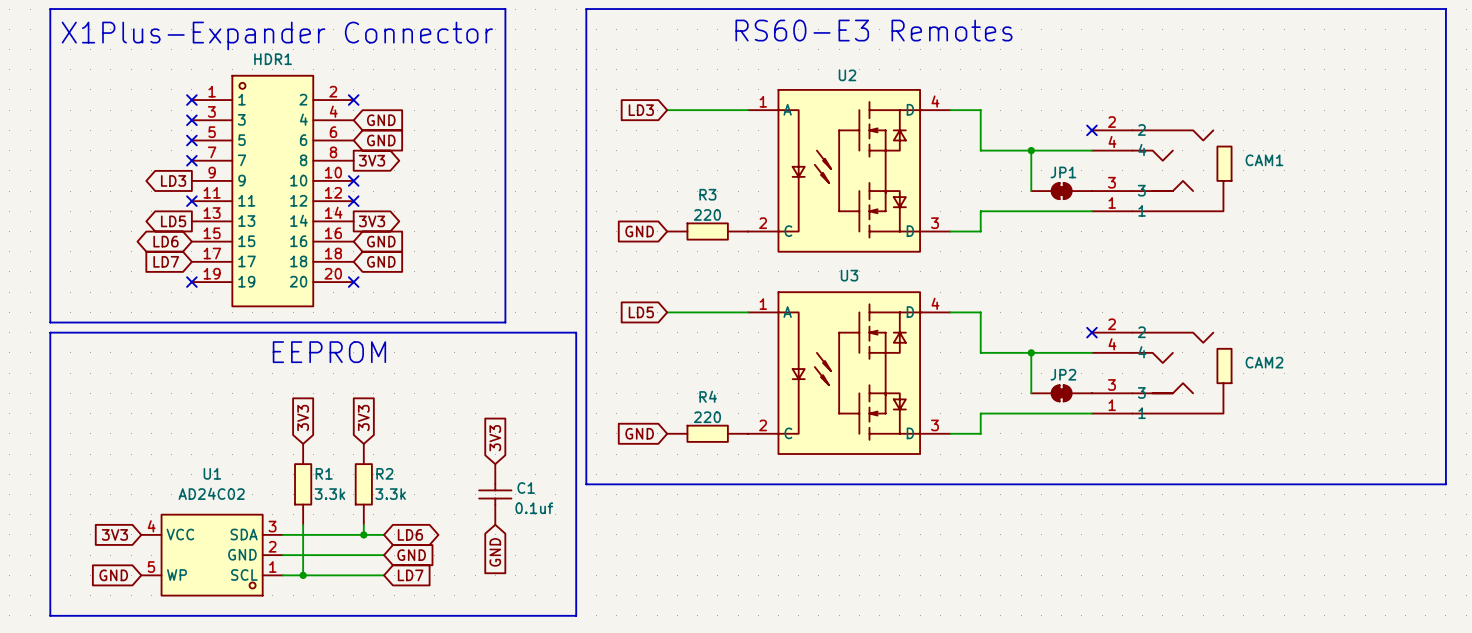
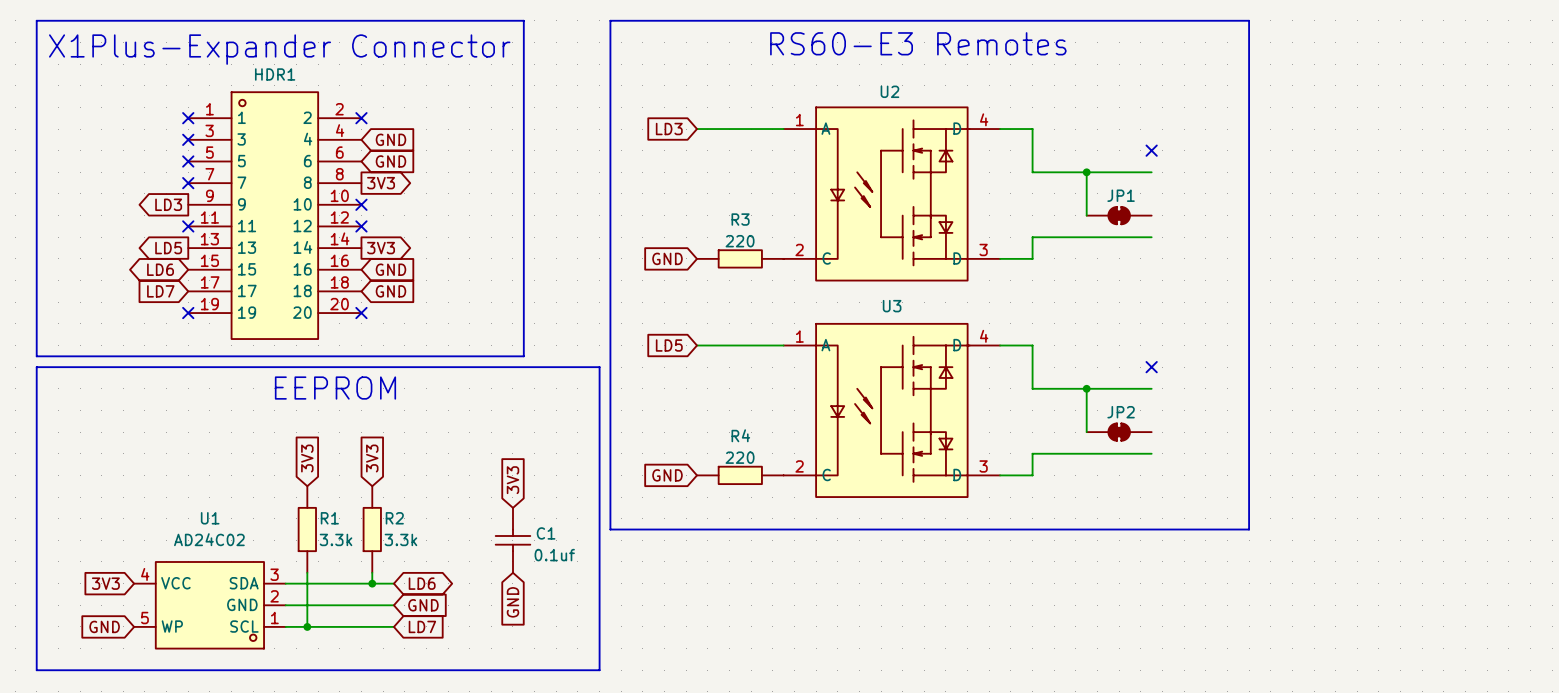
line: (1182, 9) (1445, 9) (1445, 484) (1182, 484) -> (1249, 20) (1249, 529)
CAM1: (1161, 170) -> none
CAM2: (1161, 373) -> none

